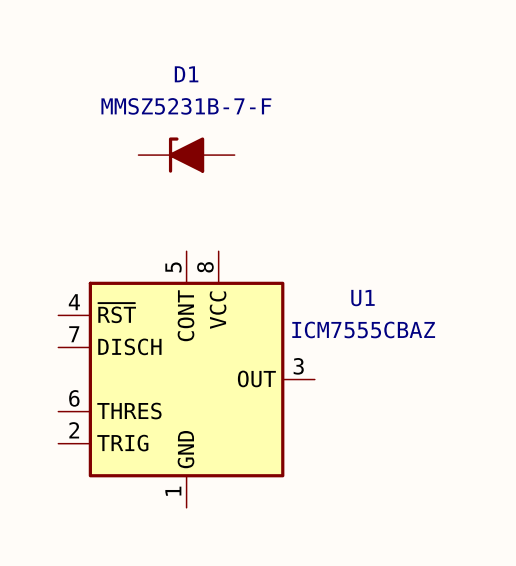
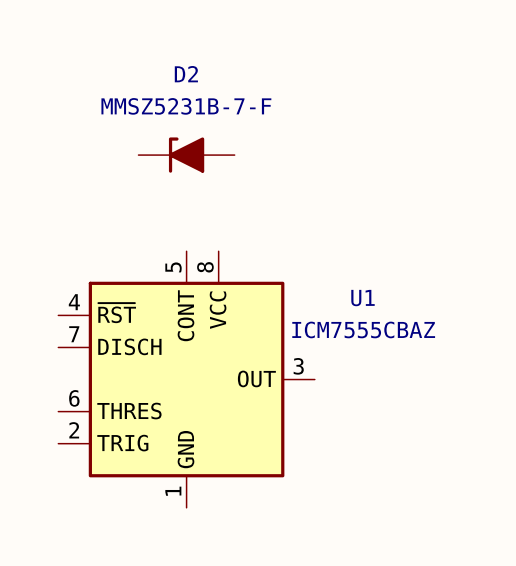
D1 name: D1 (186, 74) -> D2 (186, 74)

